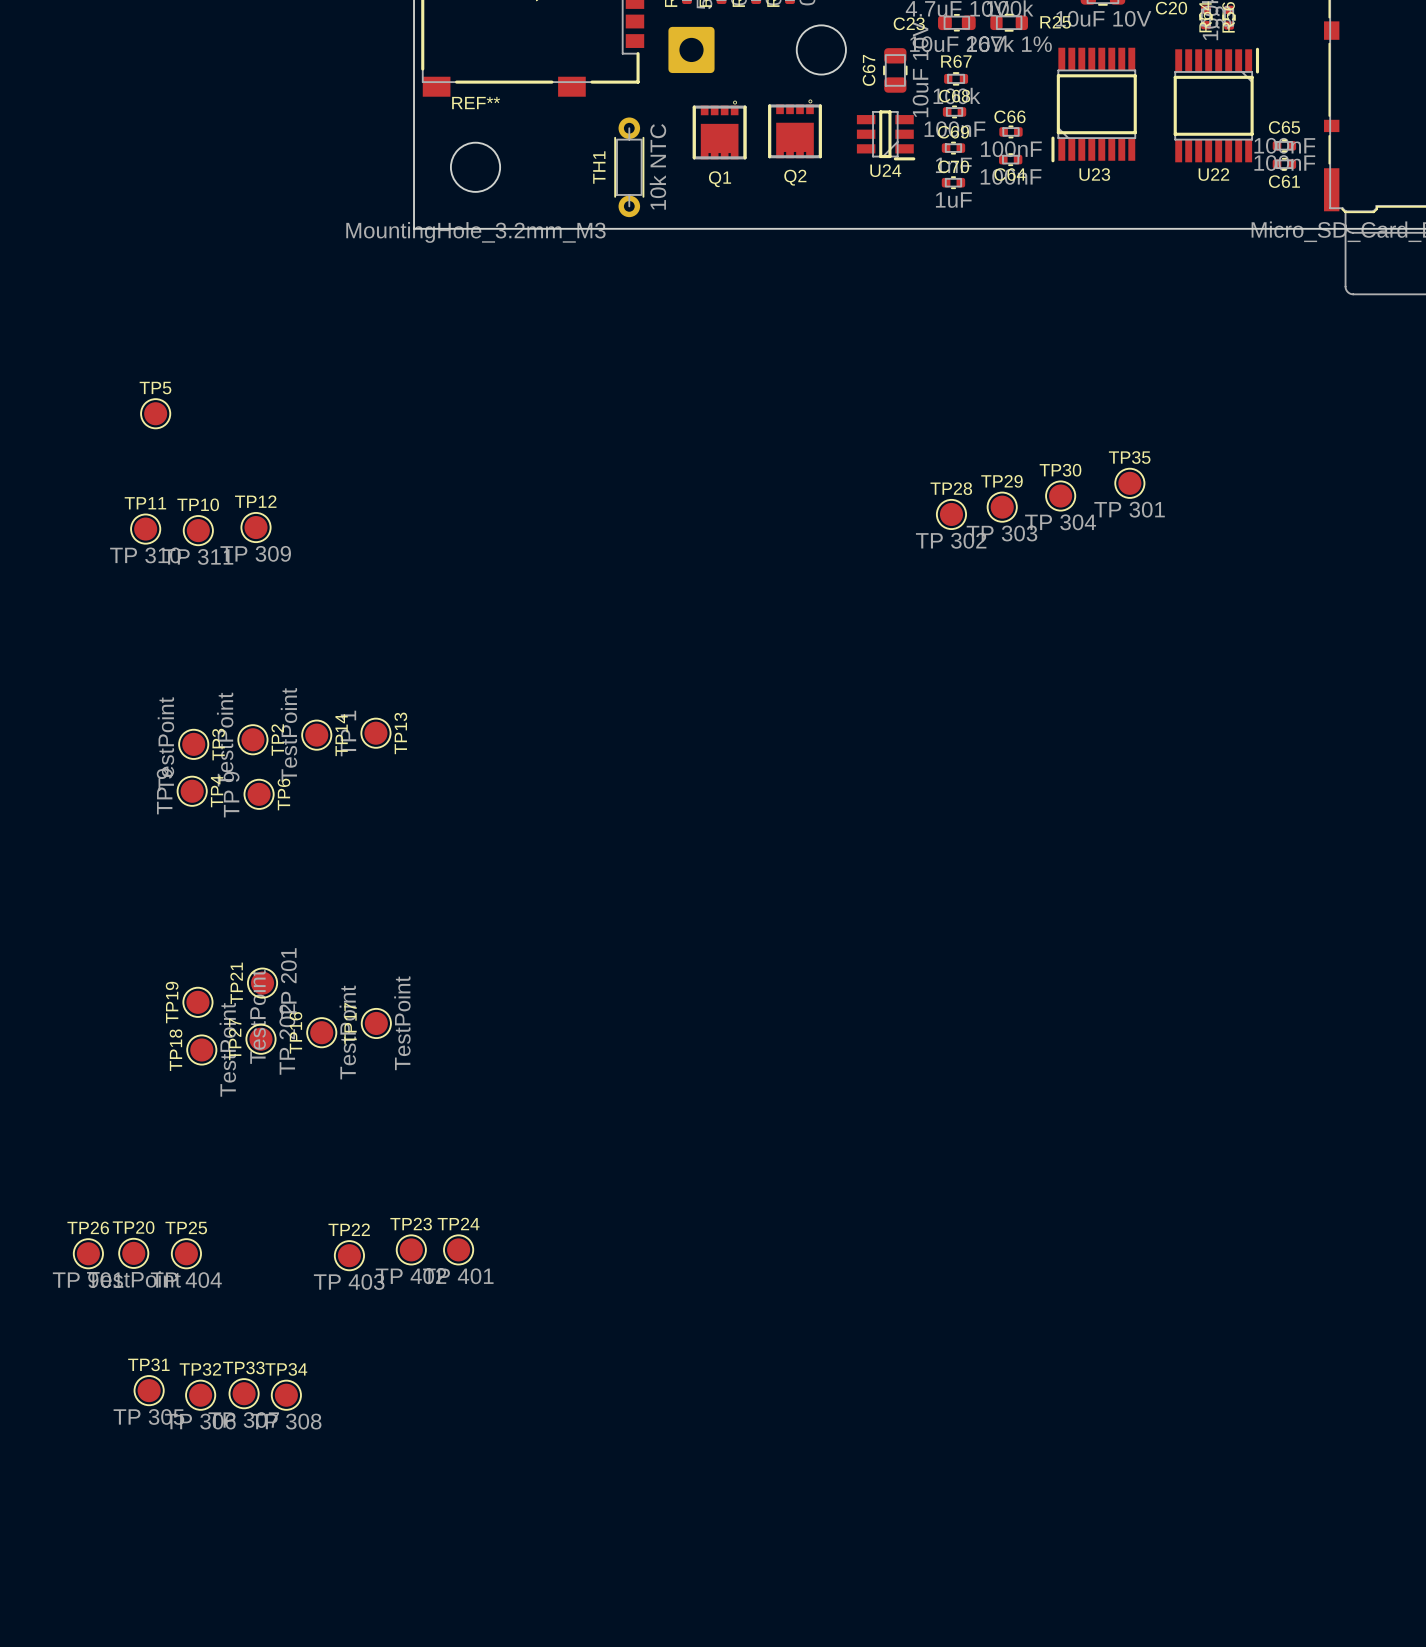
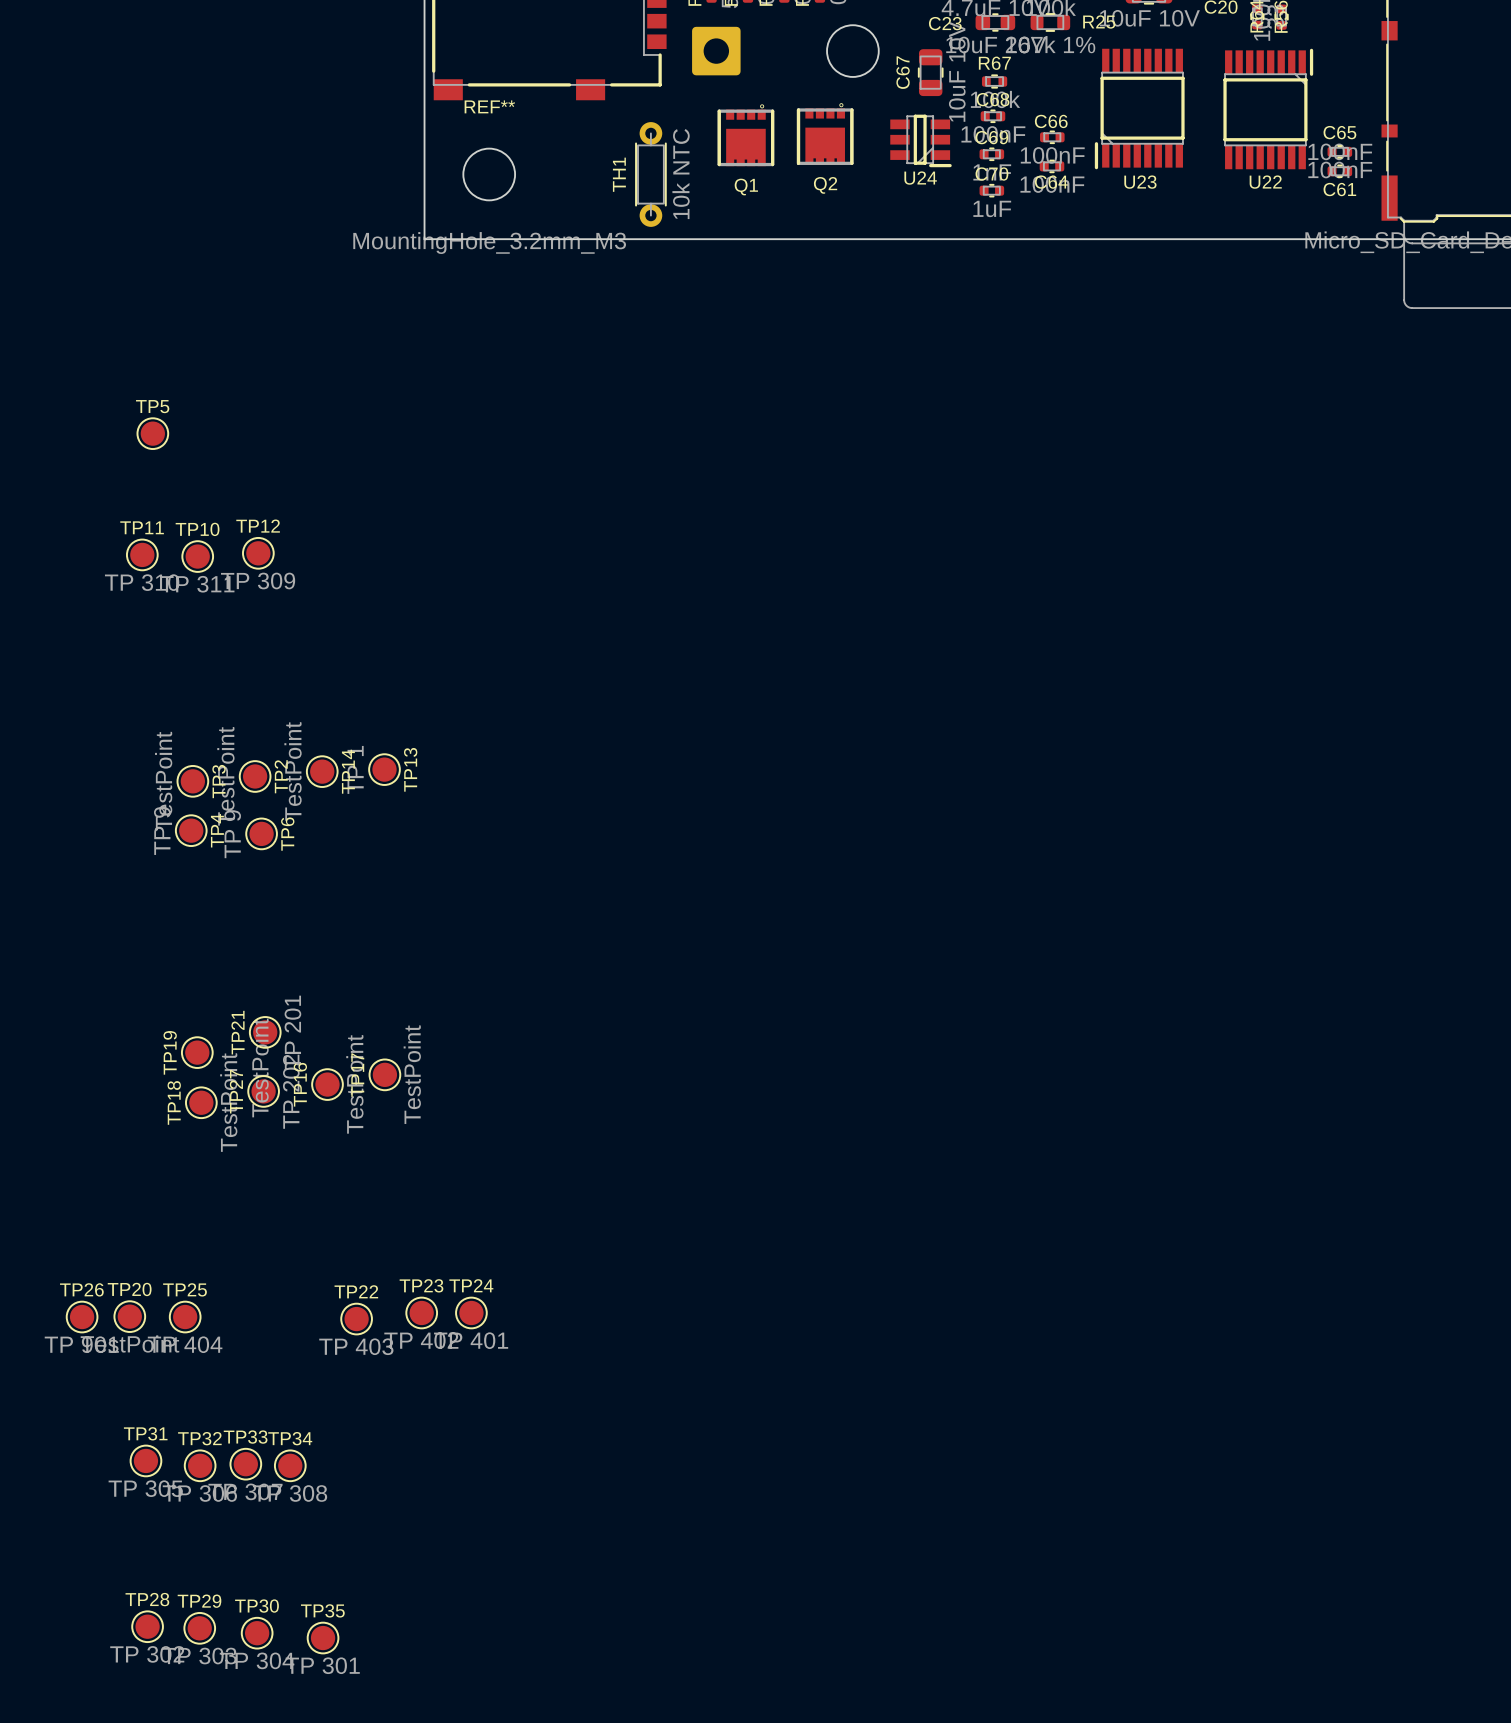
TP35 position: (1129, 483) -> (323, 1638)
TP30 position: (1060, 496) -> (257, 1633)
TP29 position: (1002, 507) -> (199, 1628)
TP28 position: (951, 514) -> (147, 1626)

